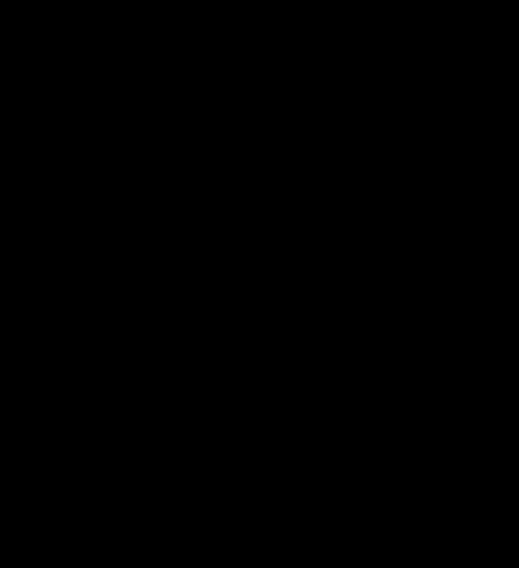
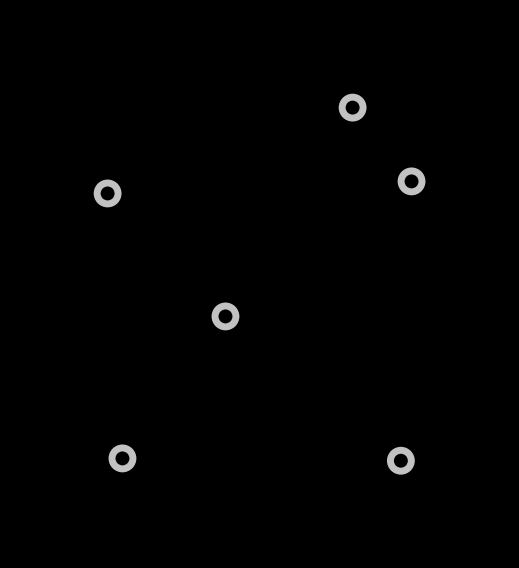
via: none -> (352, 107)
via: none -> (411, 181)
via: none -> (107, 193)
via: none -> (225, 316)
via: none -> (122, 458)
via: none -> (400, 460)

